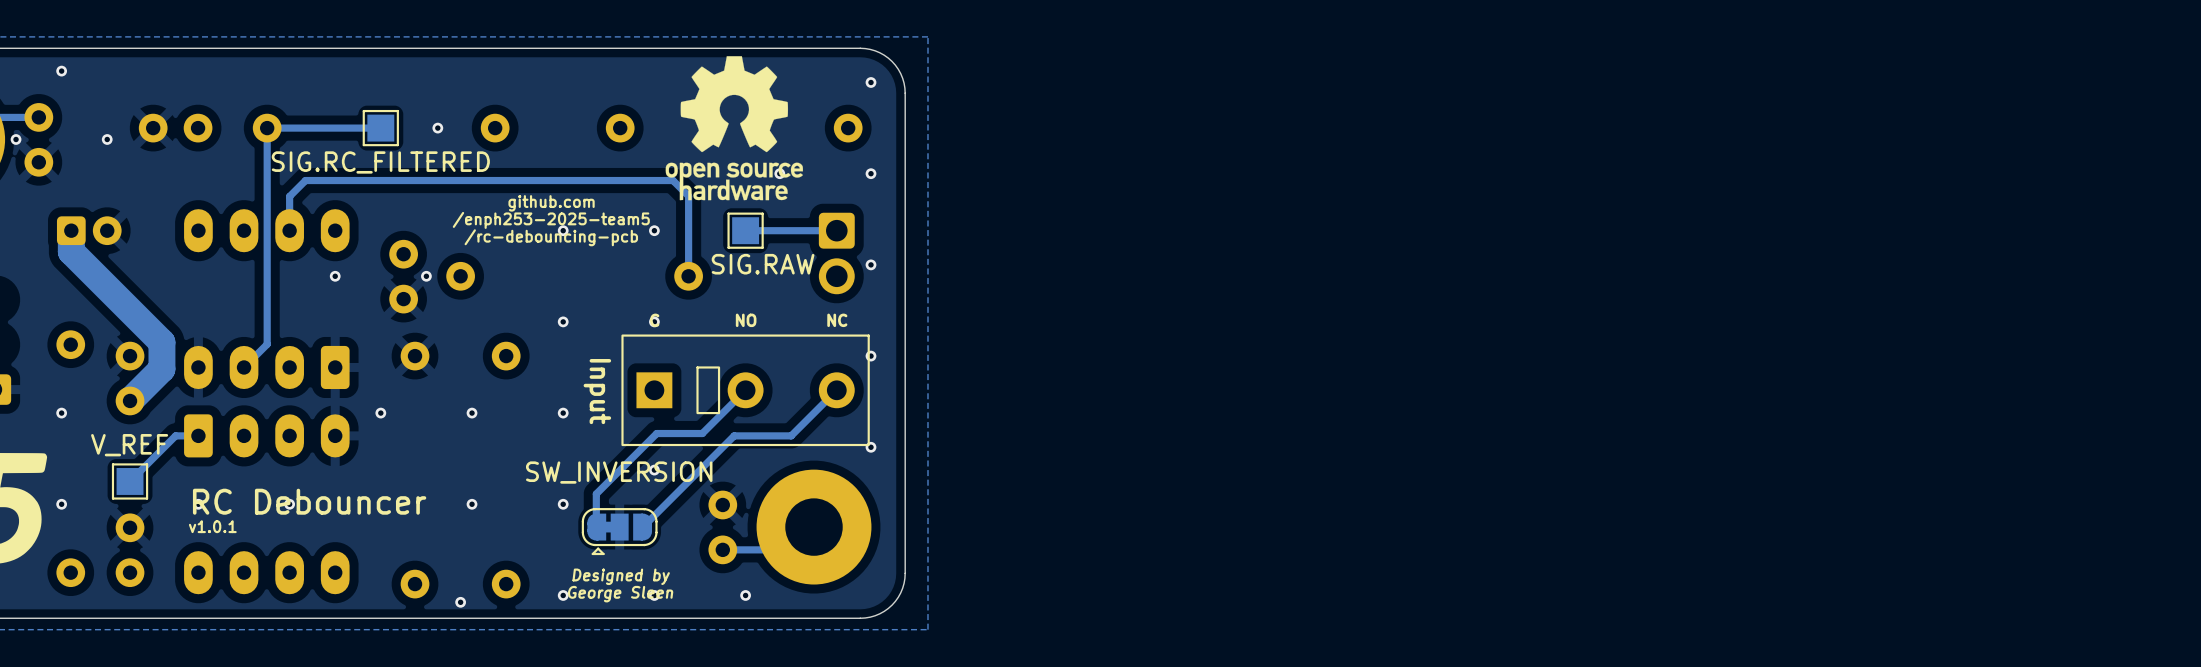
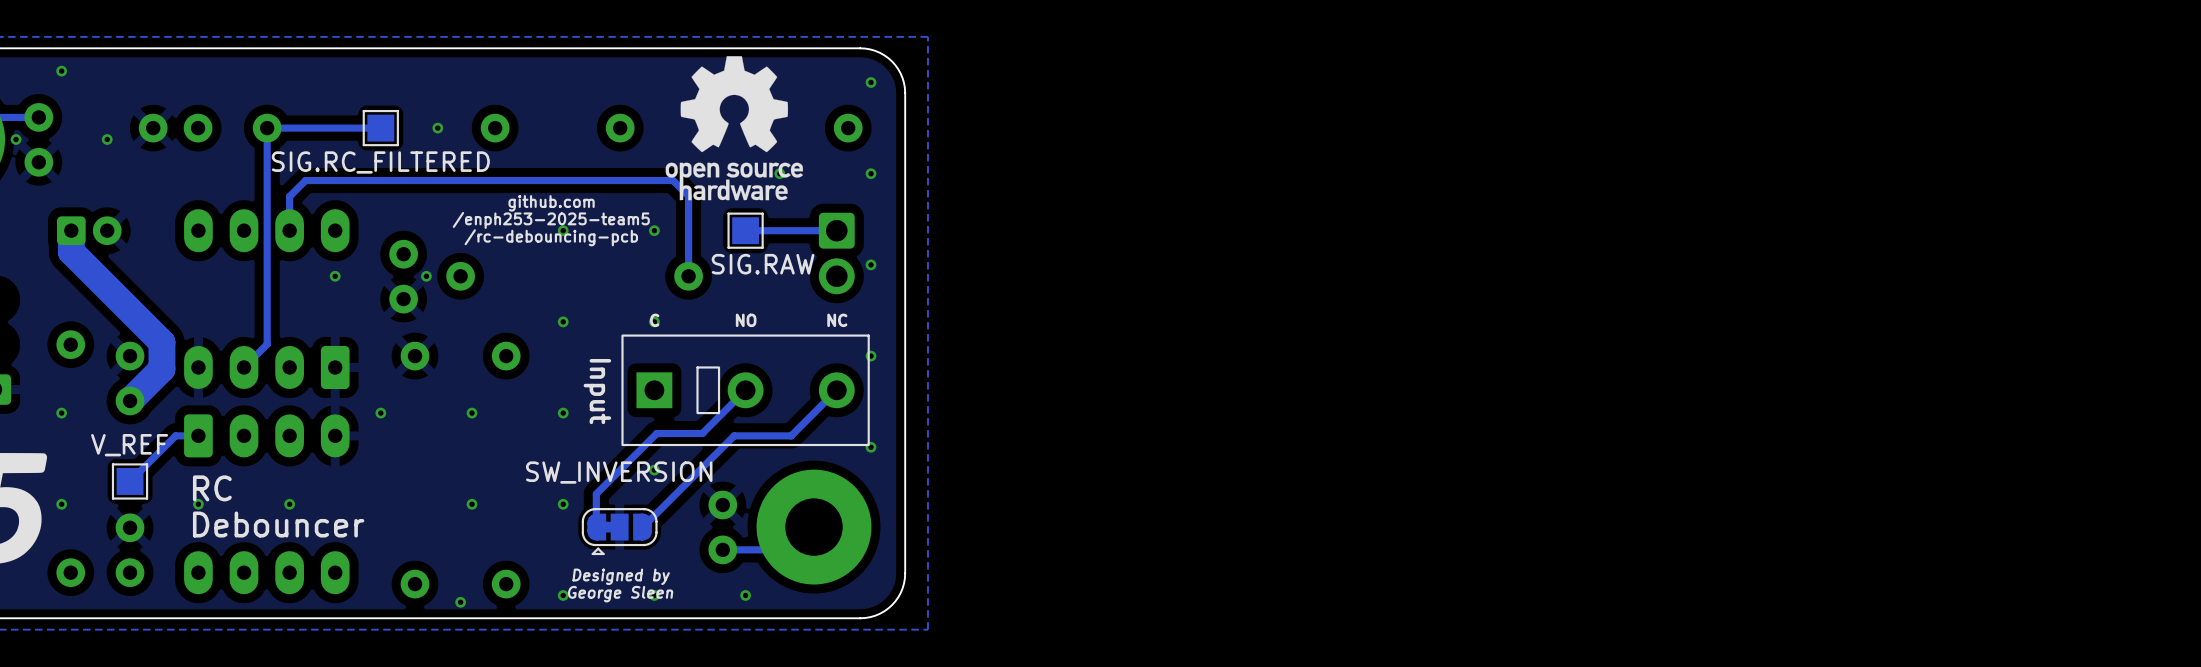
text: none -> RC (212, 488)
text: RC Debouncer (309, 501) -> Debouncer (278, 524)
text: v1.0.1 (212, 526) -> none

